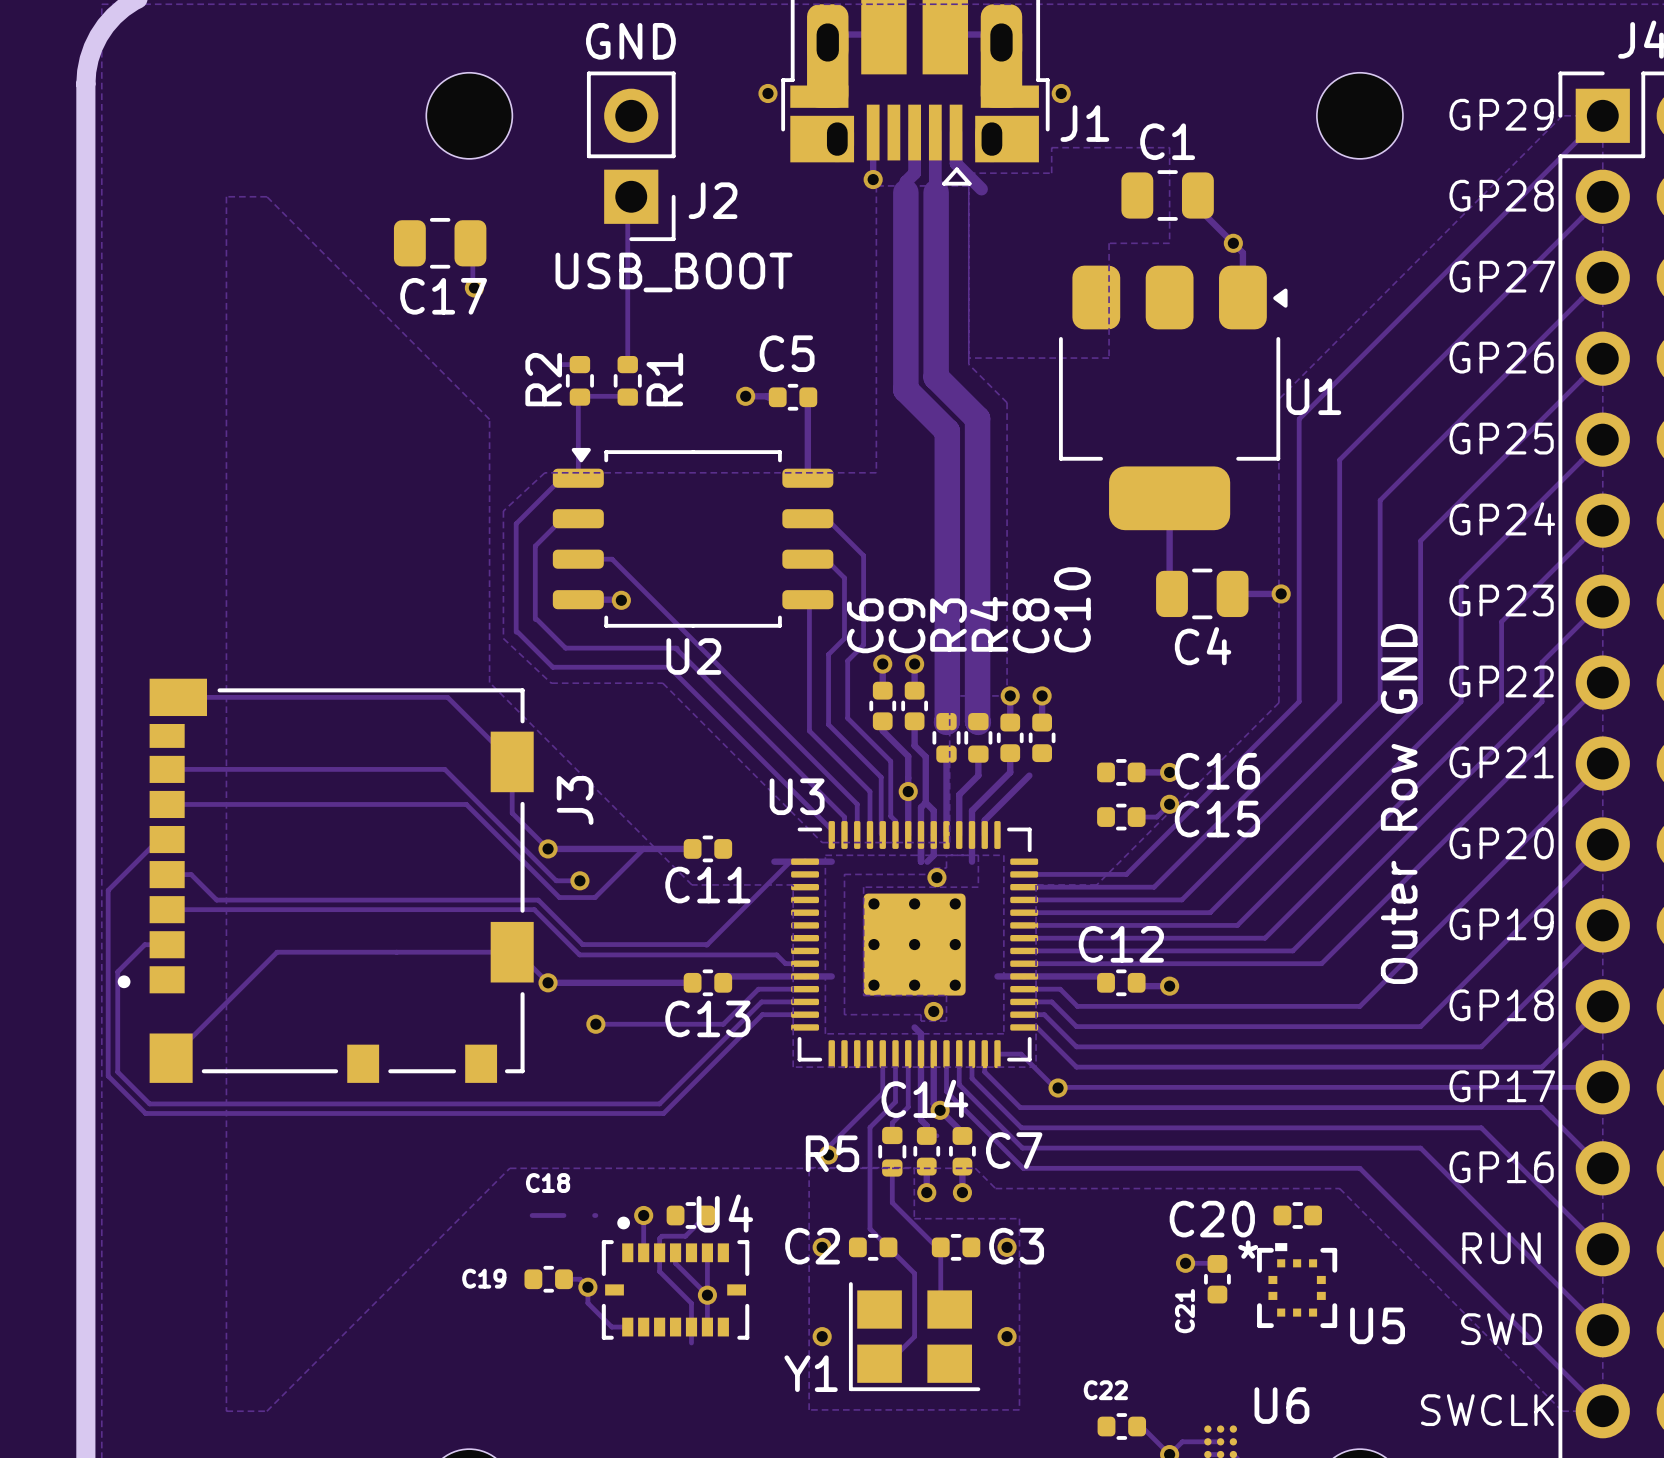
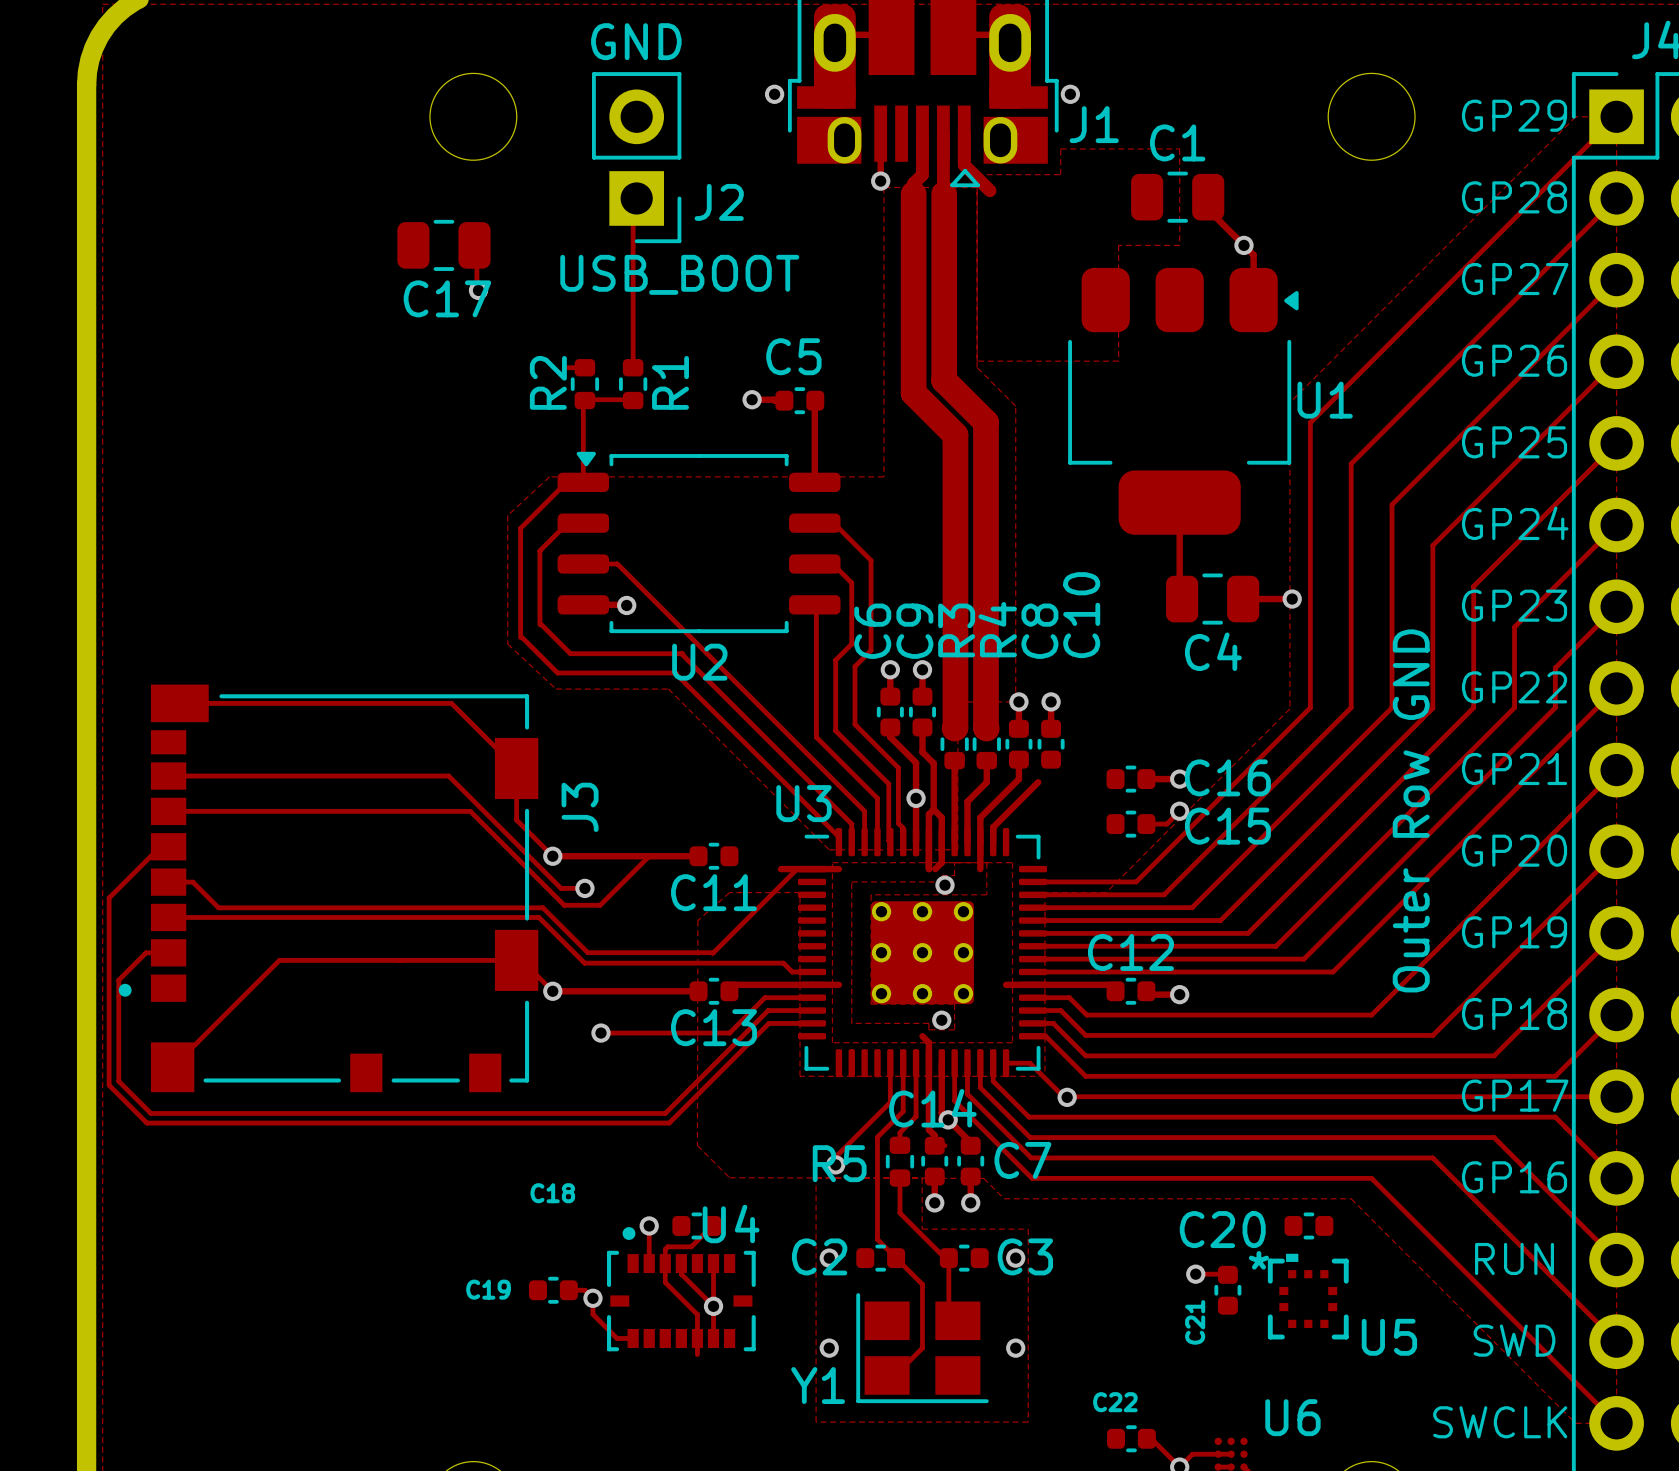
zone outline: (723, 884) (691, 884) (489, 682) (489, 419) (266, 196) (226, 196) (226, 1411) (266, 1411) (509, 1168) (975, 1168) -> (729, 892) (697, 920) (697, 1145) (729, 1177) (983, 1178)
track: (532, 1215) (563, 1215) -> none
track: (594, 1215) (595, 1215) -> none

